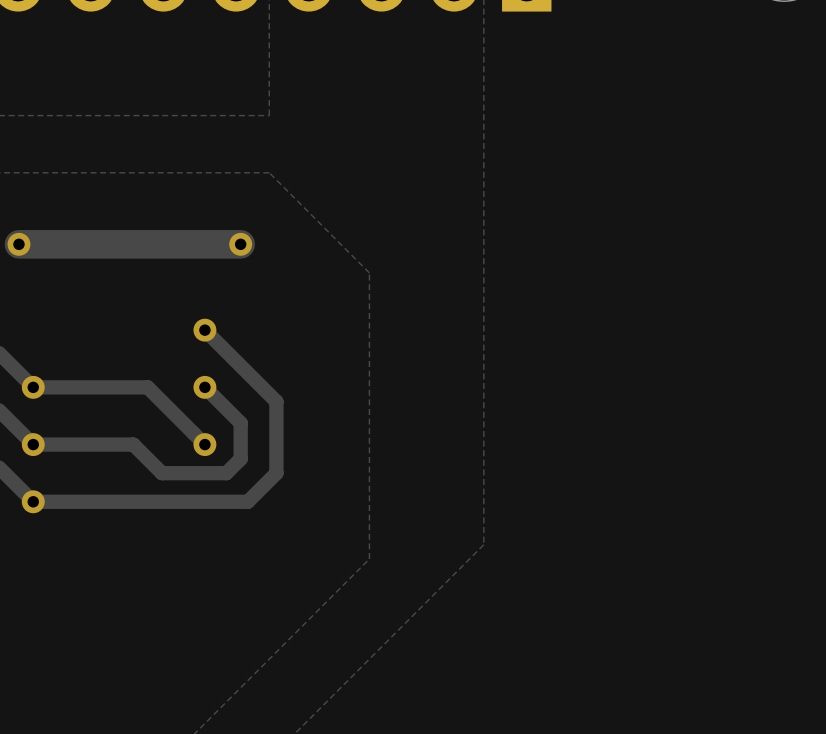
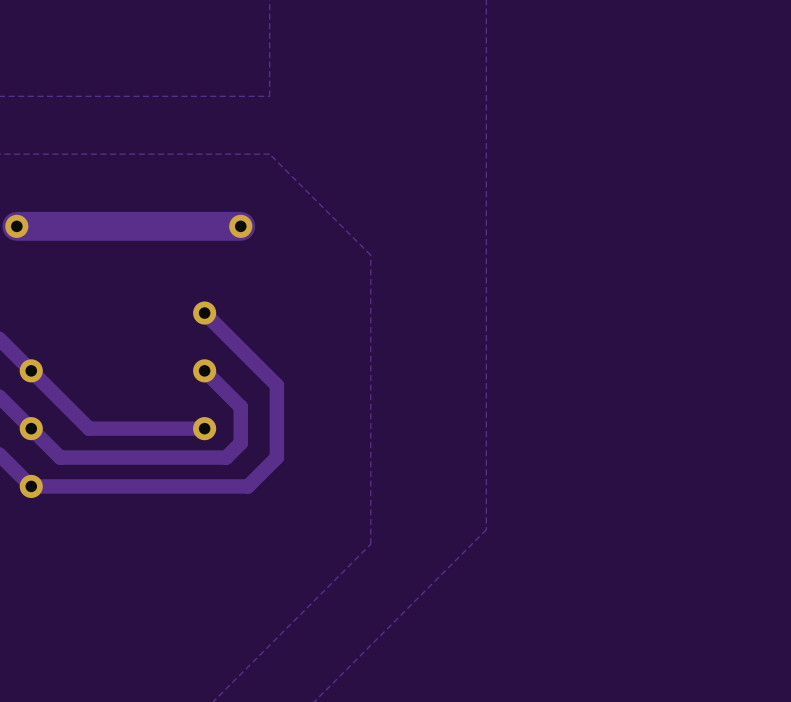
track: (33, 387) (147, 387) (204, 444) -> none
track: none -> (31, 428) (60, 457) (161, 457)
track: (90, 444) (33, 444) -> (89, 428) (31, 370)
track: (133, 444) (162, 473) -> (132, 428) (204, 428)

